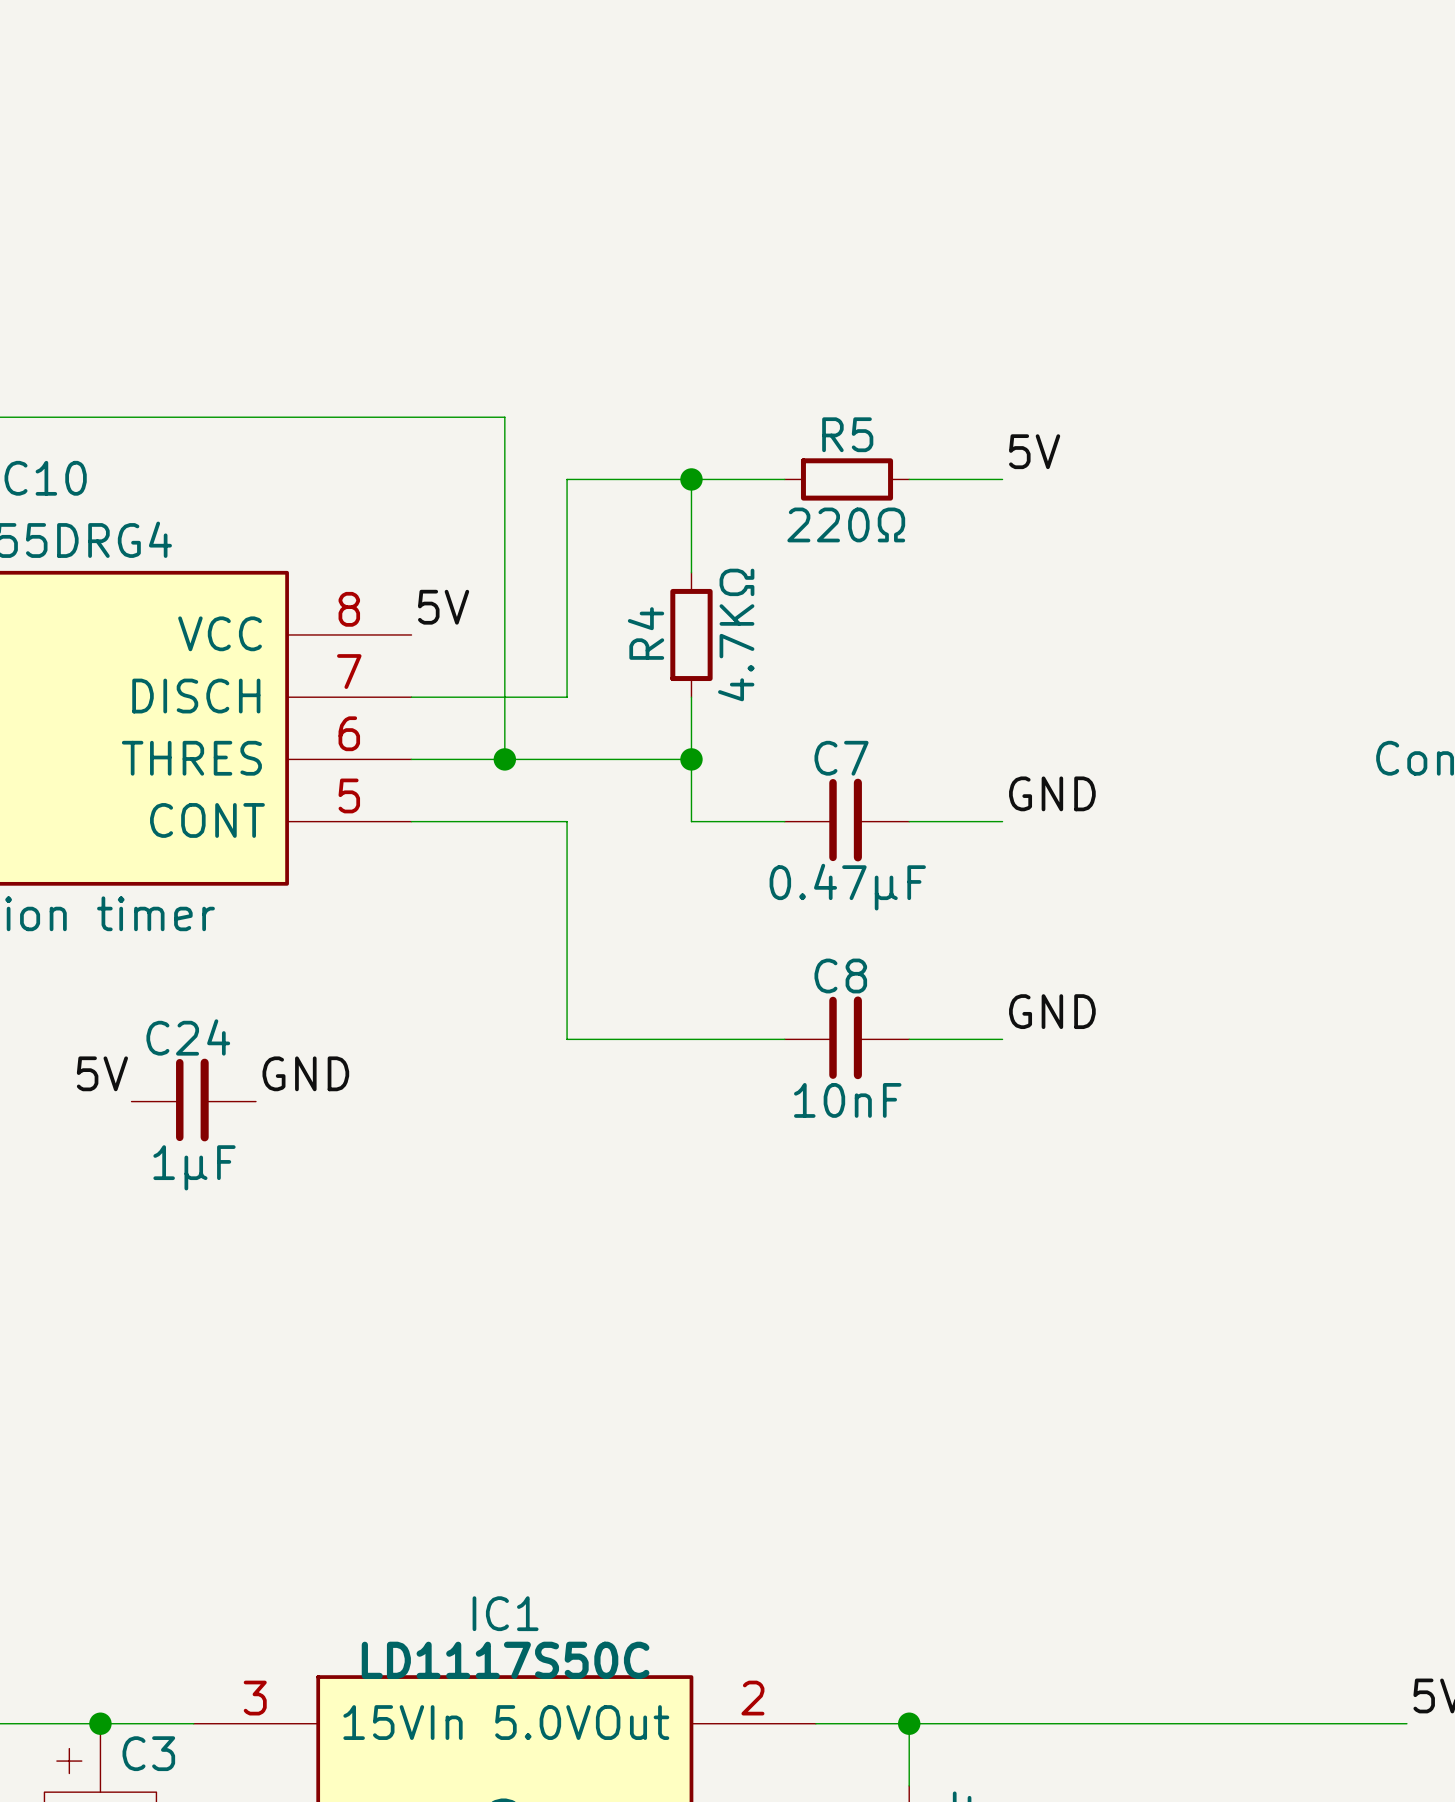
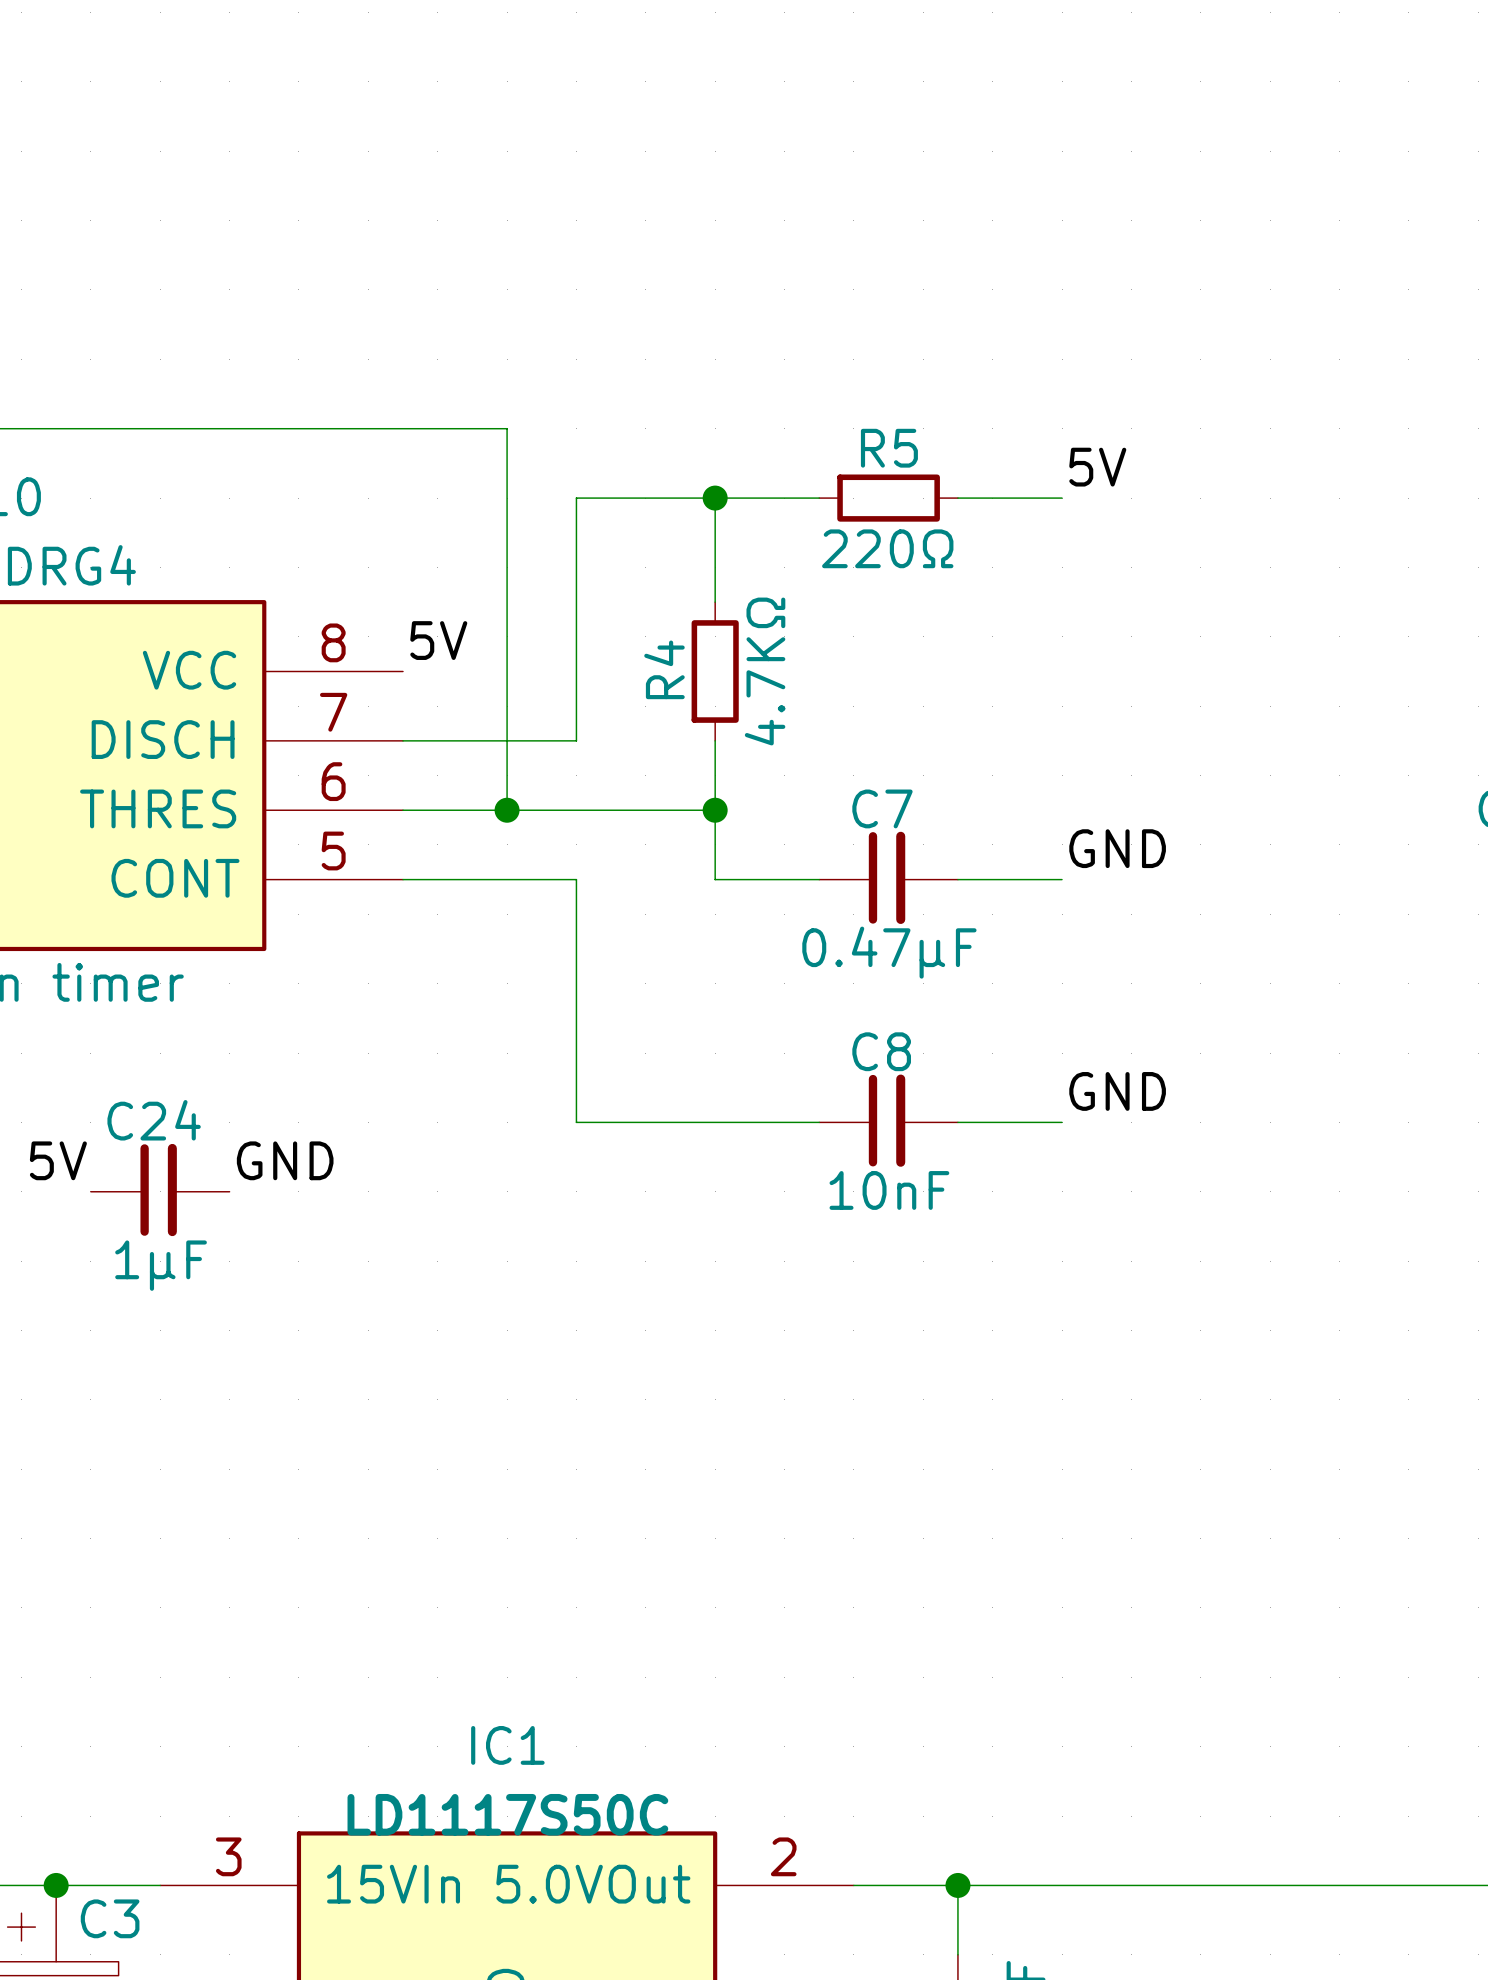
IC1 name position: IC1 (505, 1613) -> IC1 (507, 1745)

